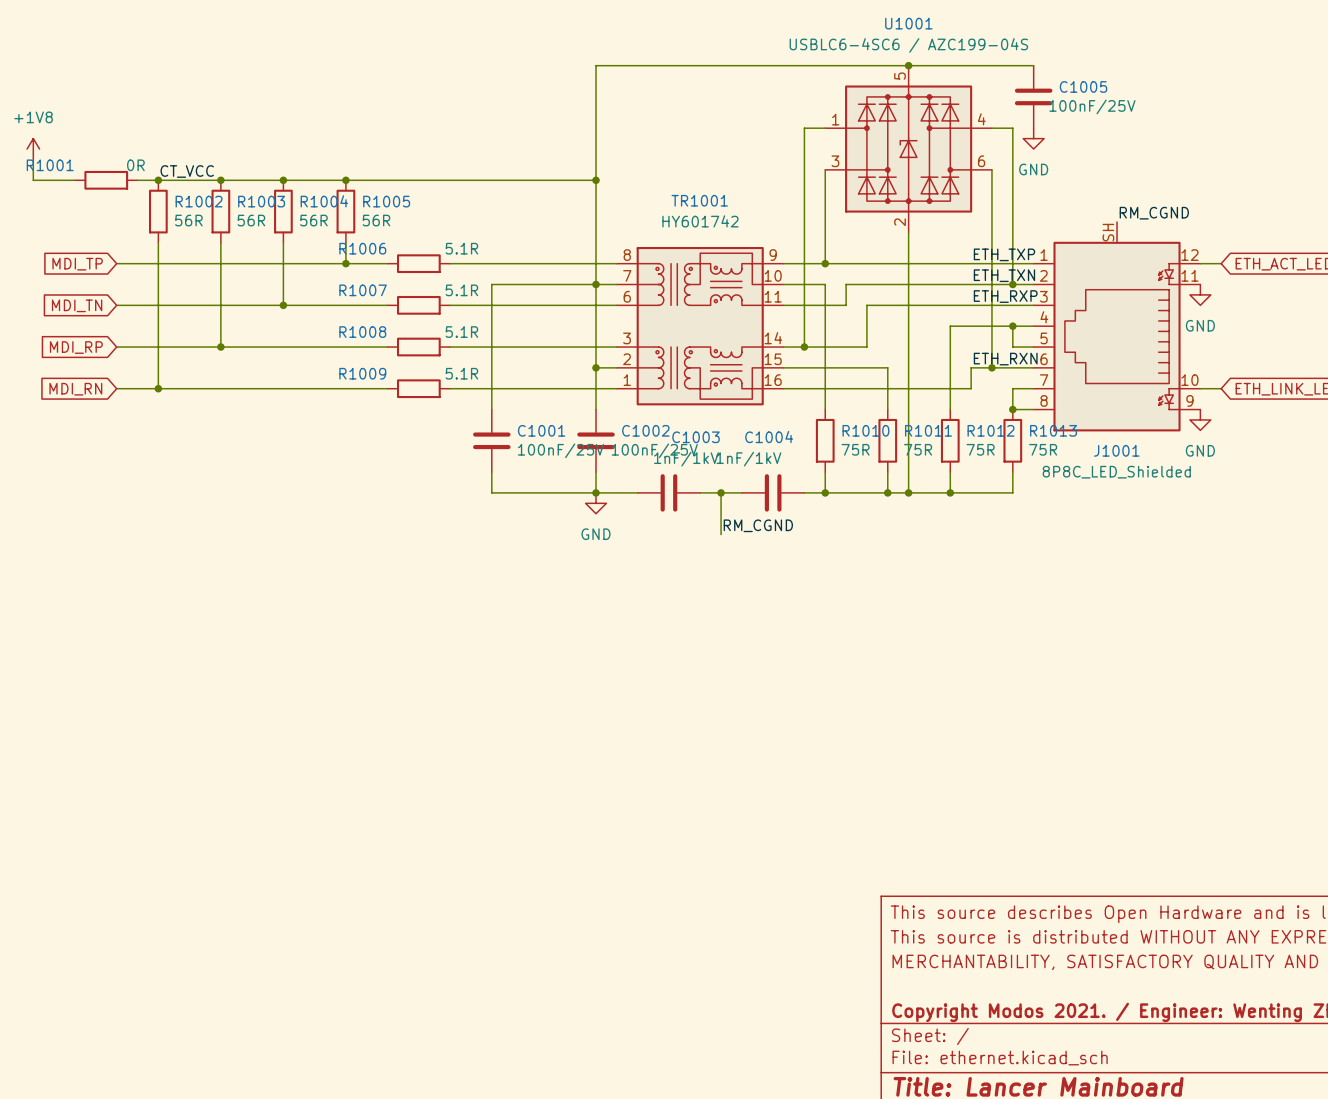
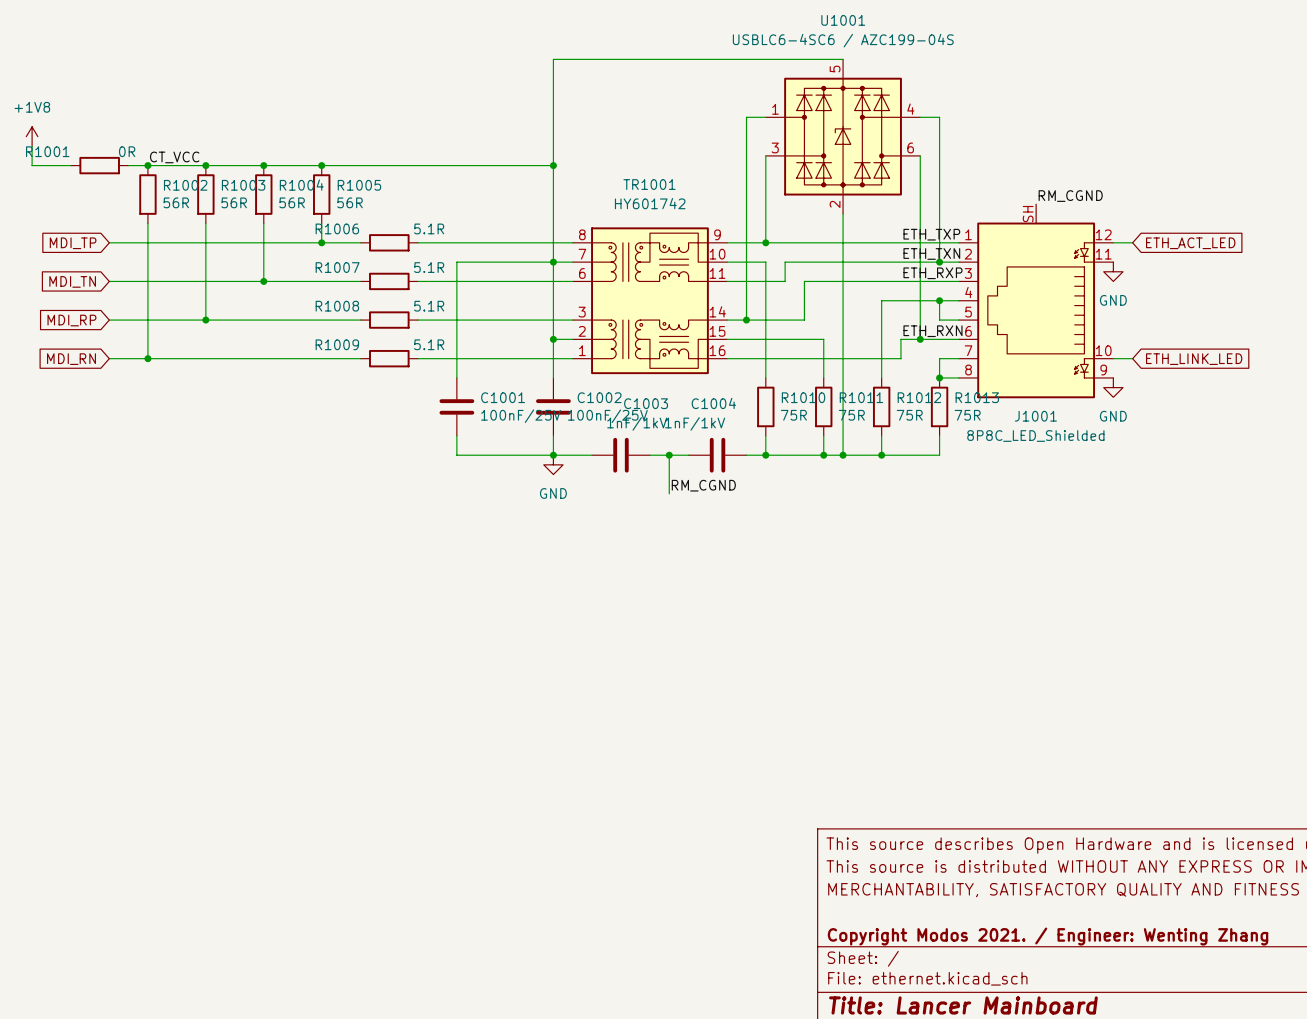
wire: (908, 65) (1033, 65) -> none
junction: (908, 65) -> none
C1005: 100nF/25V (1033, 96) -> none
power symbol: GND (1033, 138) -> none

